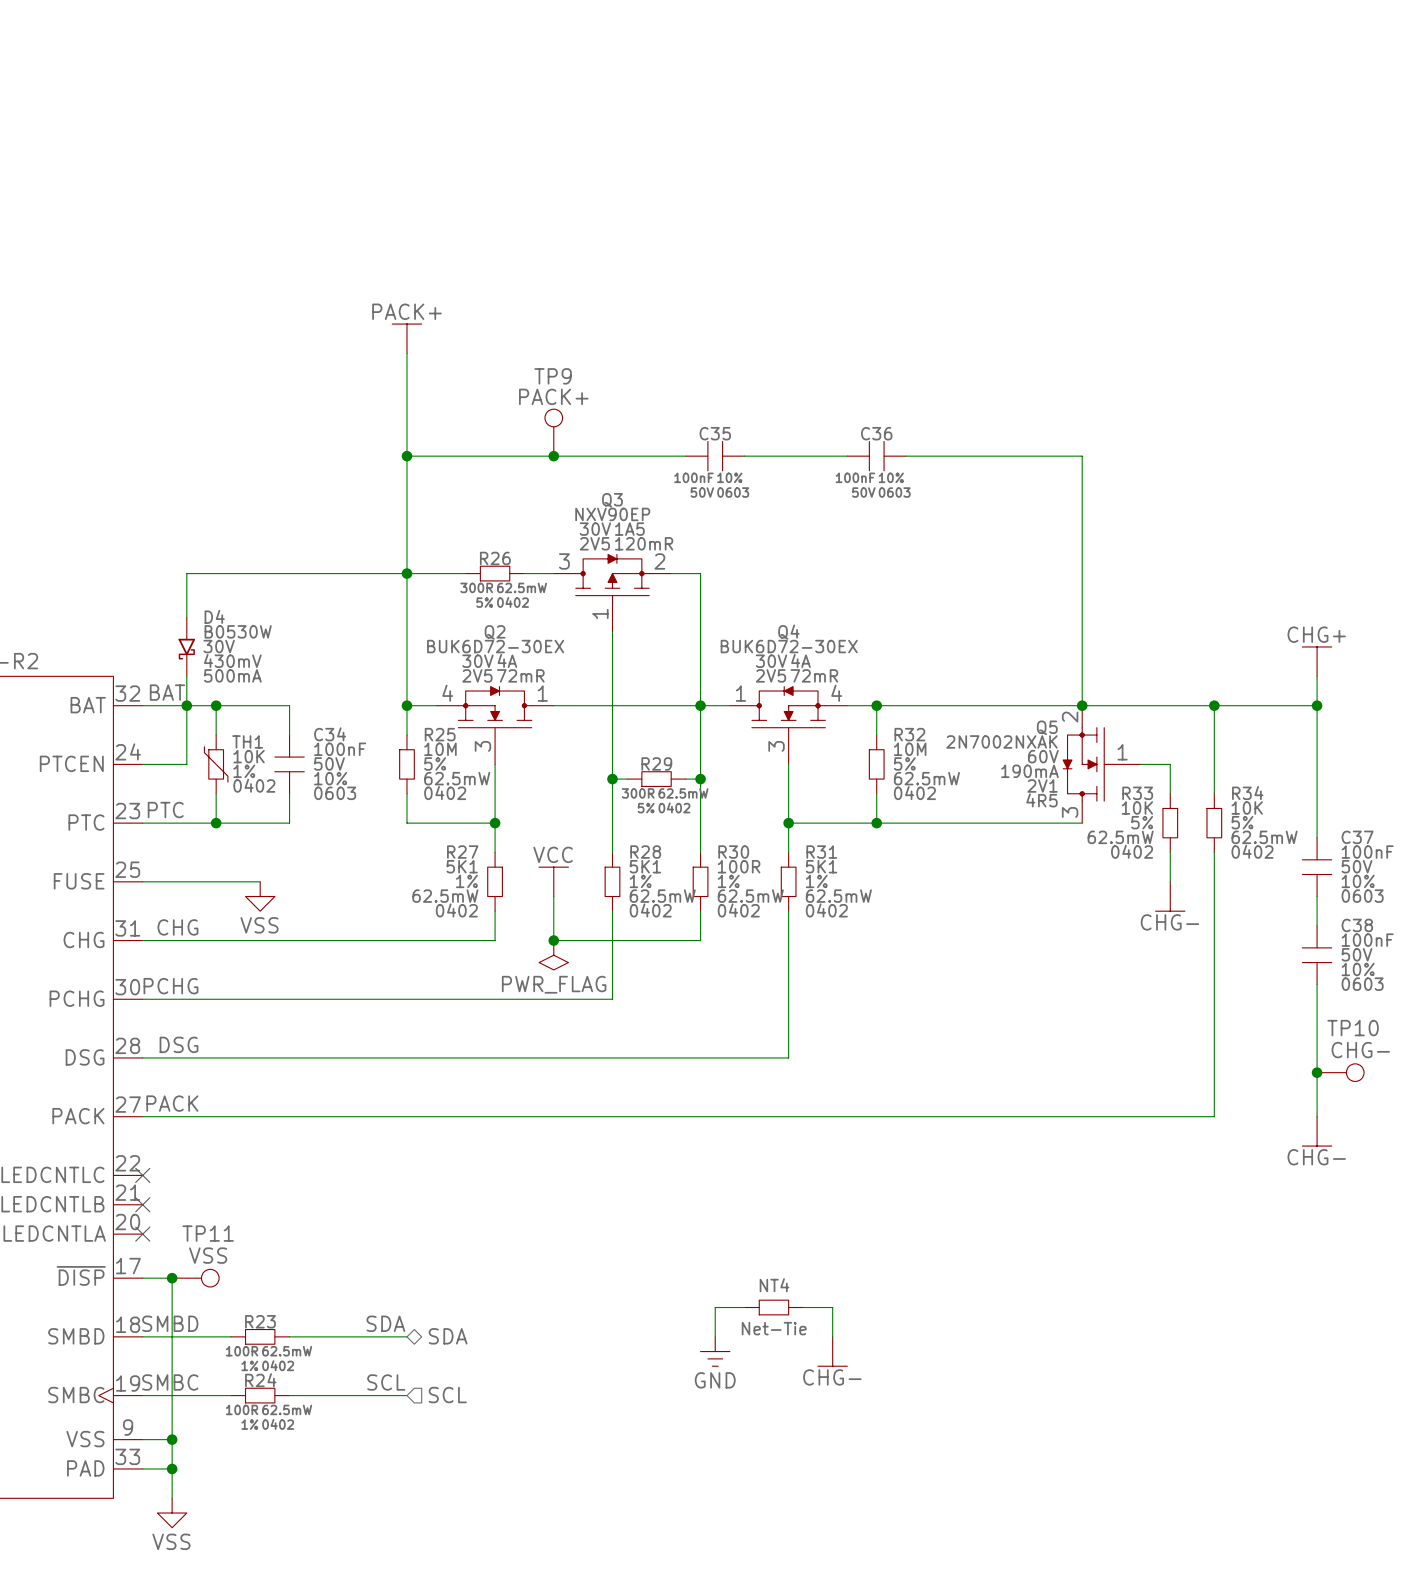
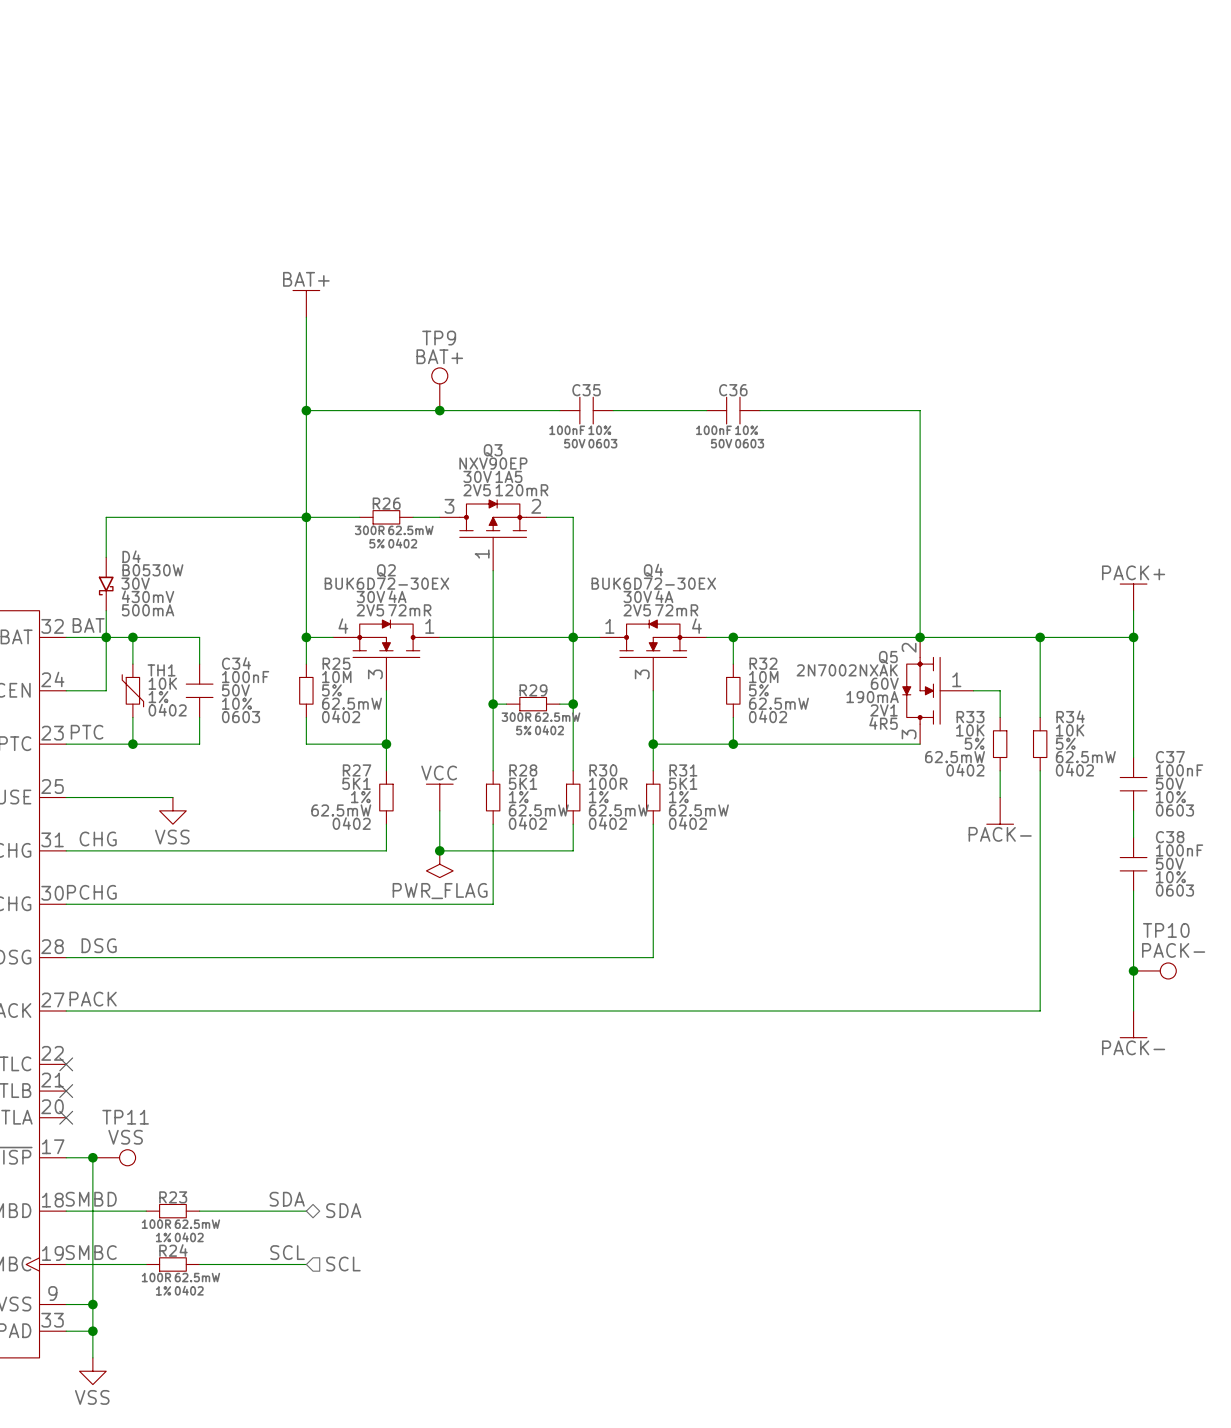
power symbol: PACK+ (406, 338) -> BAT+ (306, 303)
TP9 value: PACK+ (553, 396) -> BAT+ (439, 356)
power symbol: CHG+ (1317, 661) -> PACK+ (1133, 597)
power symbol: CHG- (1170, 896) -> PACK- (1000, 810)
TP10 value: CHG- (1360, 1050) -> PACK- (1173, 950)
power symbol: CHG- (1317, 1131) -> PACK- (1133, 1024)
wire: (744, 1307) (715, 1307) (715, 1336) -> none
NT4: Net-Tie (773, 1307) -> none
wire: (803, 1307) (832, 1307) (832, 1336) -> none
power symbol: GND (715, 1351) -> none
power symbol: CHG- (832, 1351) -> none

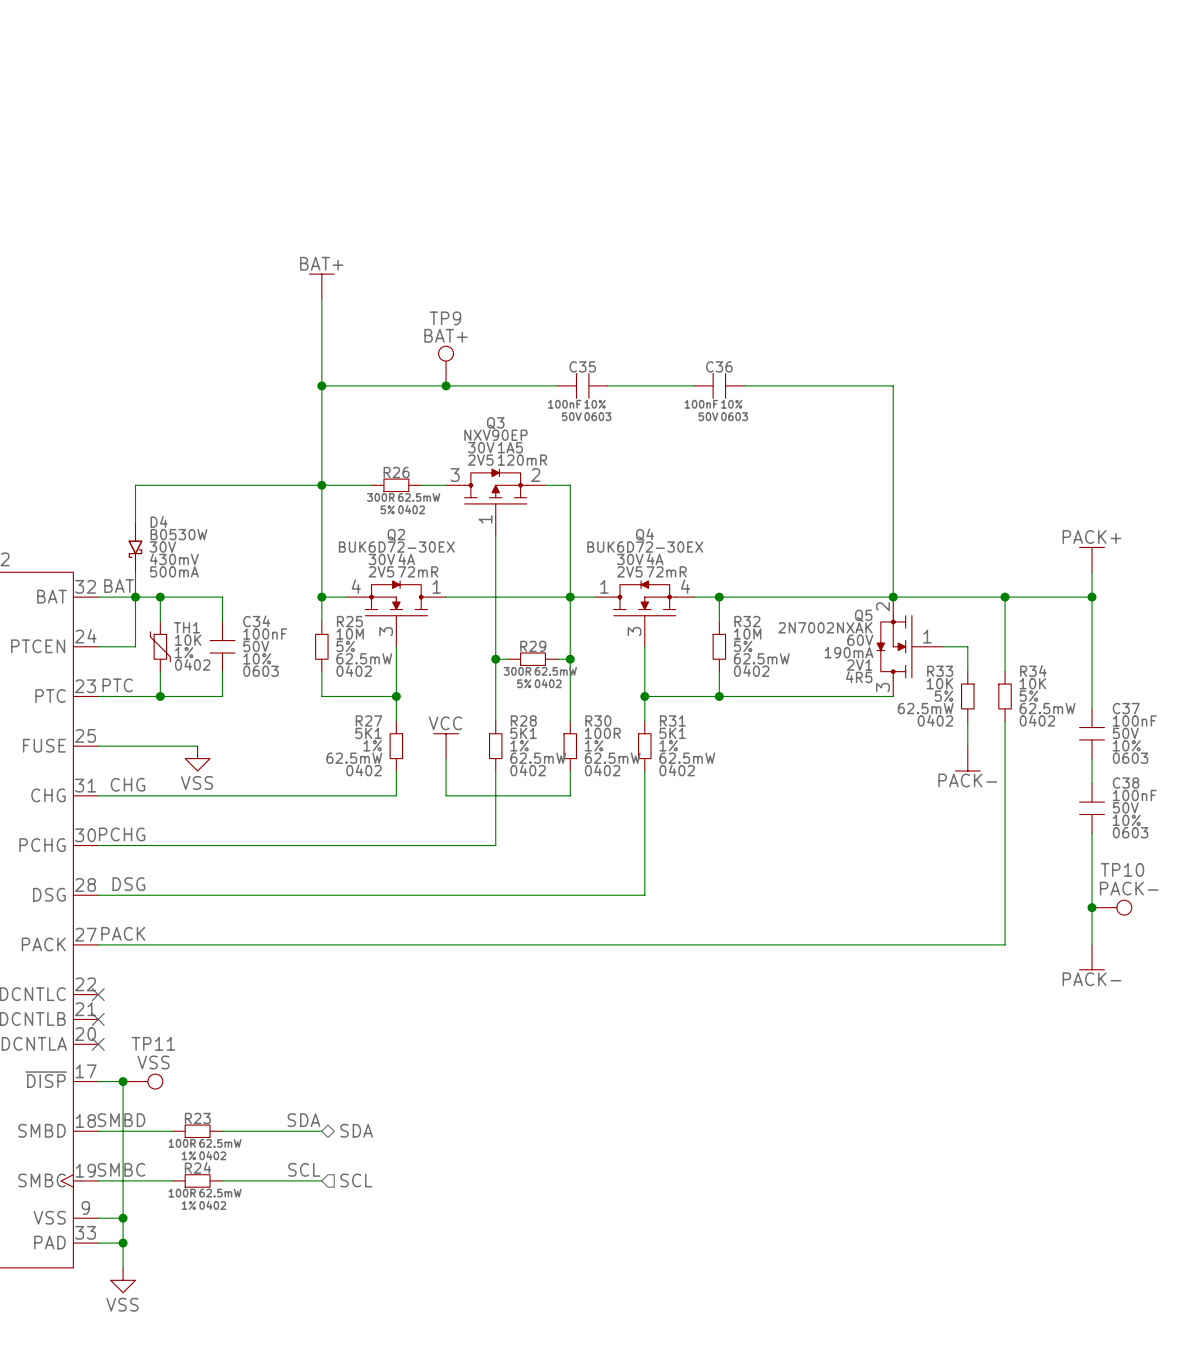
junction: (439, 850) -> none
power symbol: PWR_FLAG (439, 864) -> none

